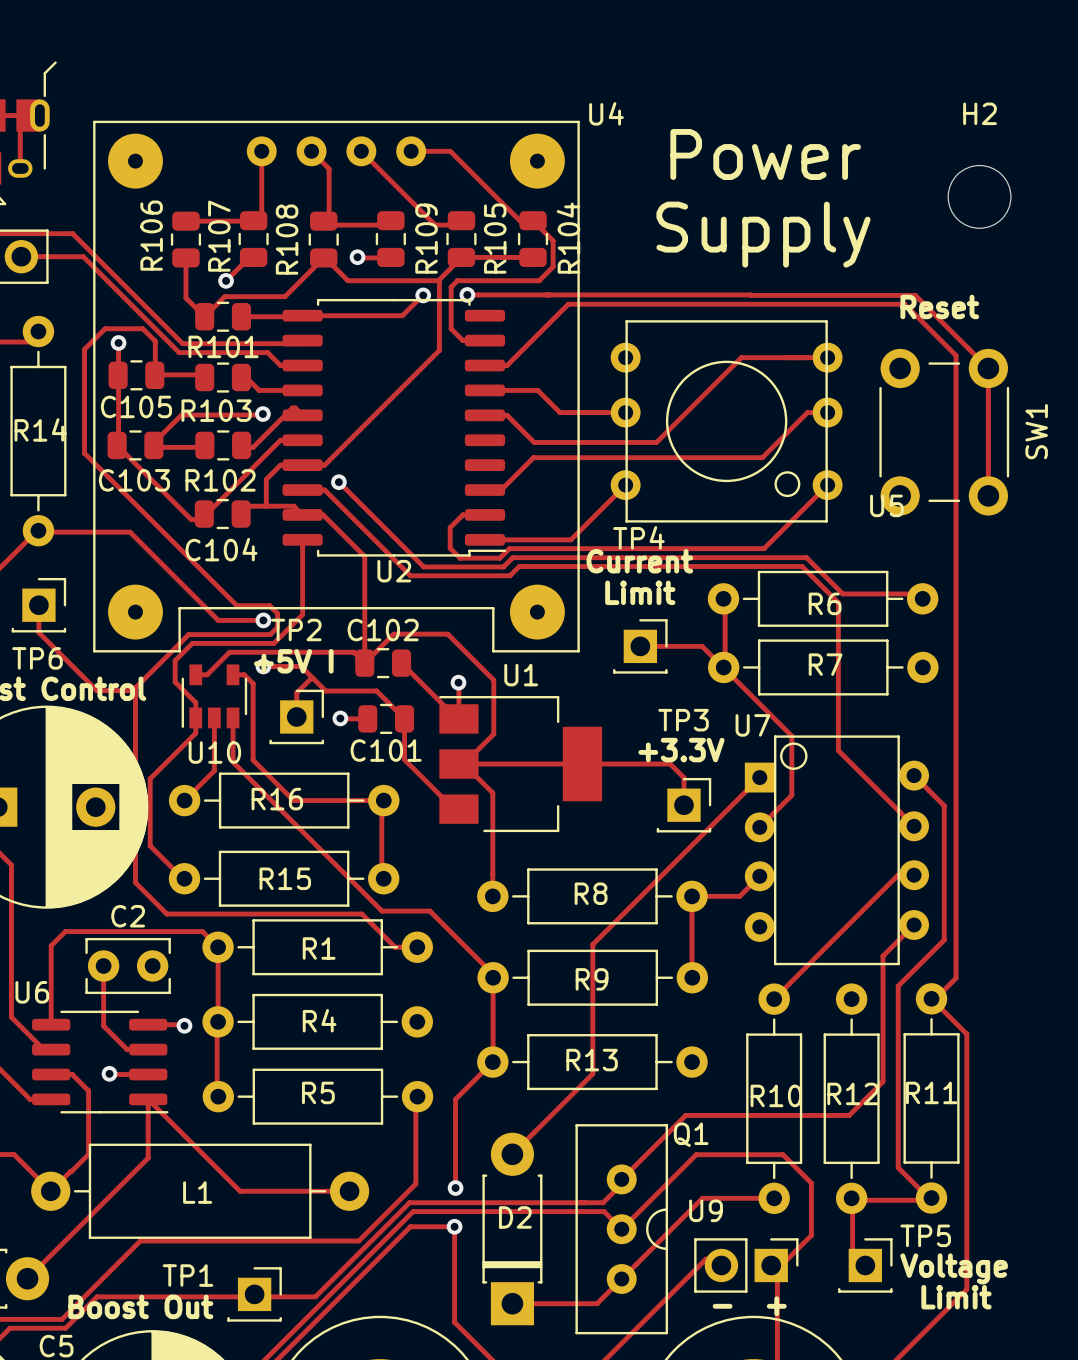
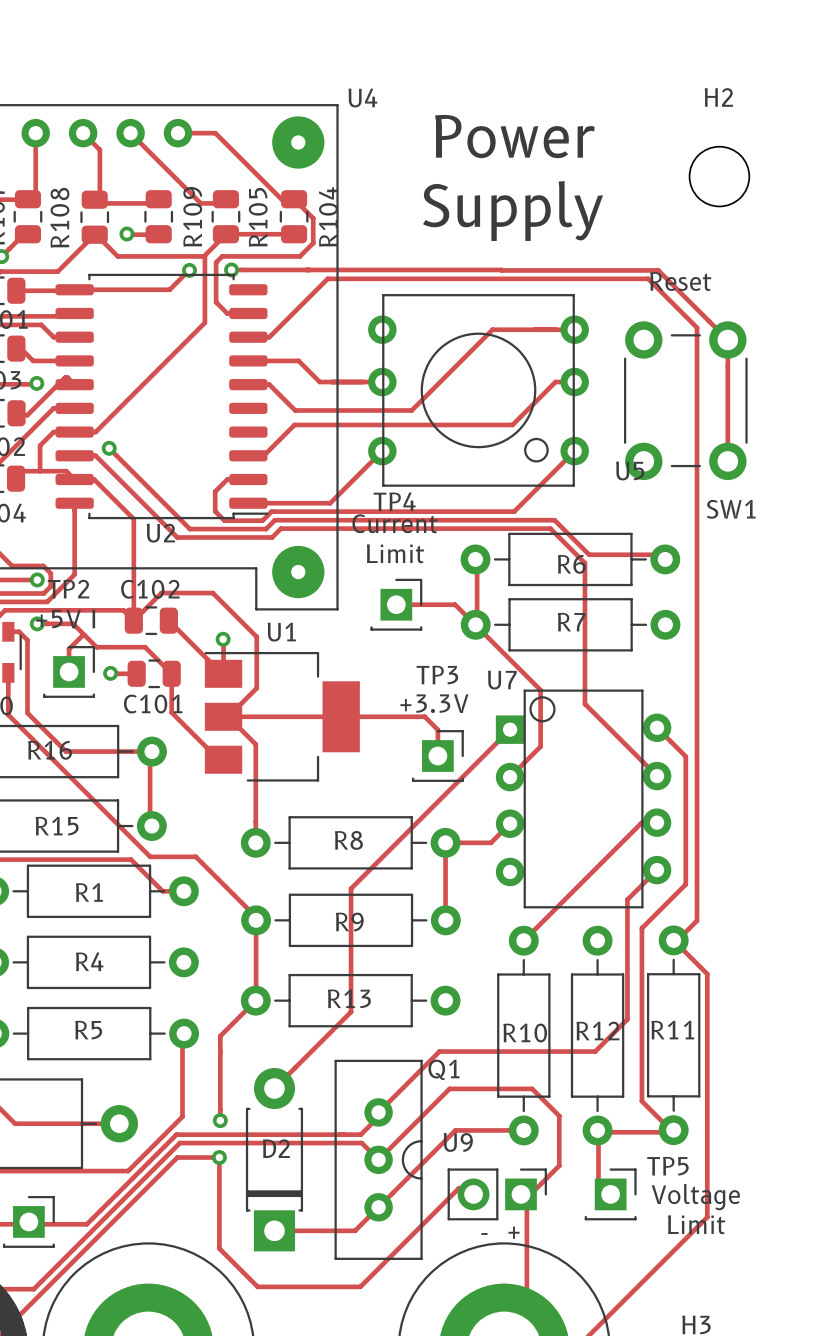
SW1 name rotation: 0° (1036, 431) -> 90° clockwise (731, 509)
SW1 name position: SW1 (1036, 431) -> SW1 (731, 509)

